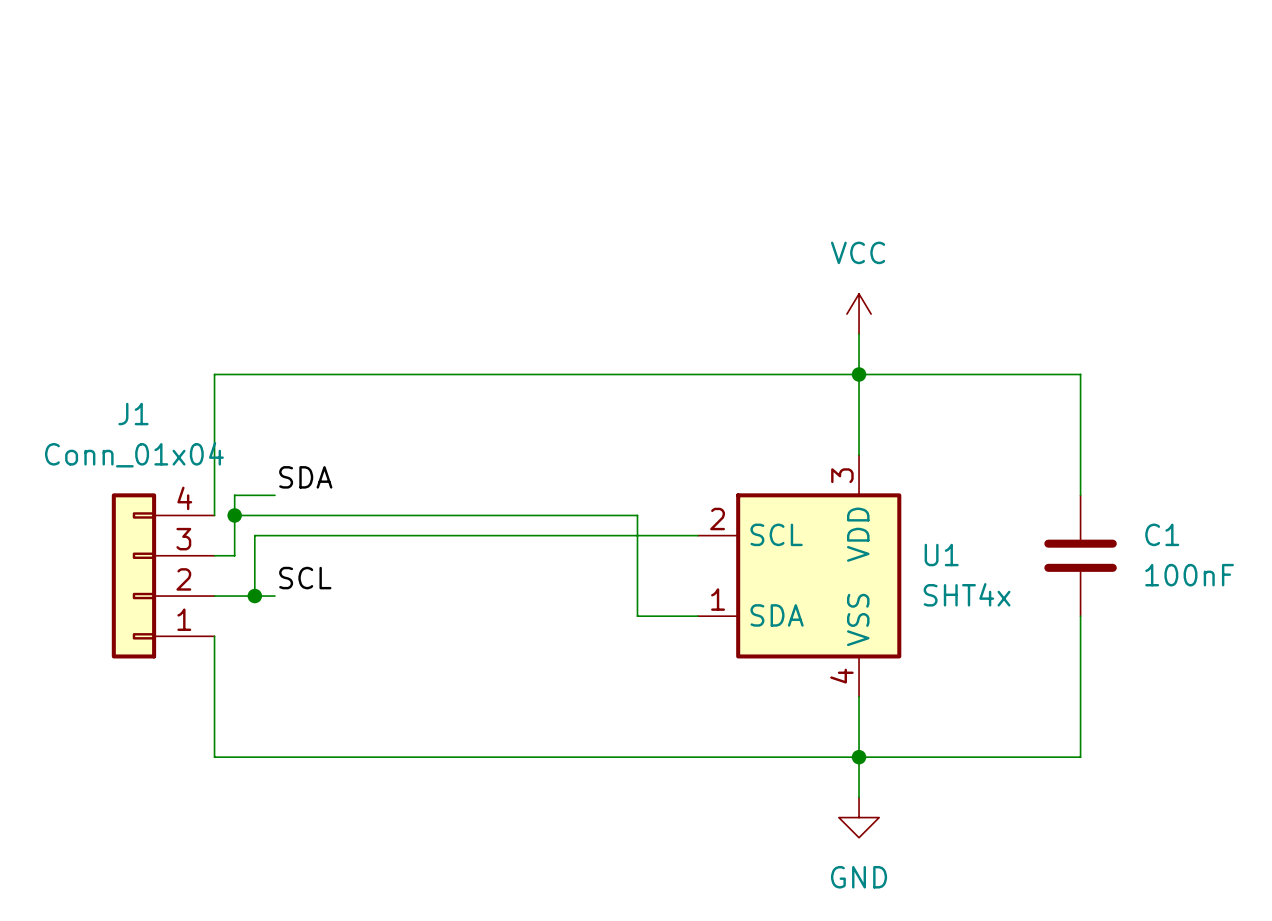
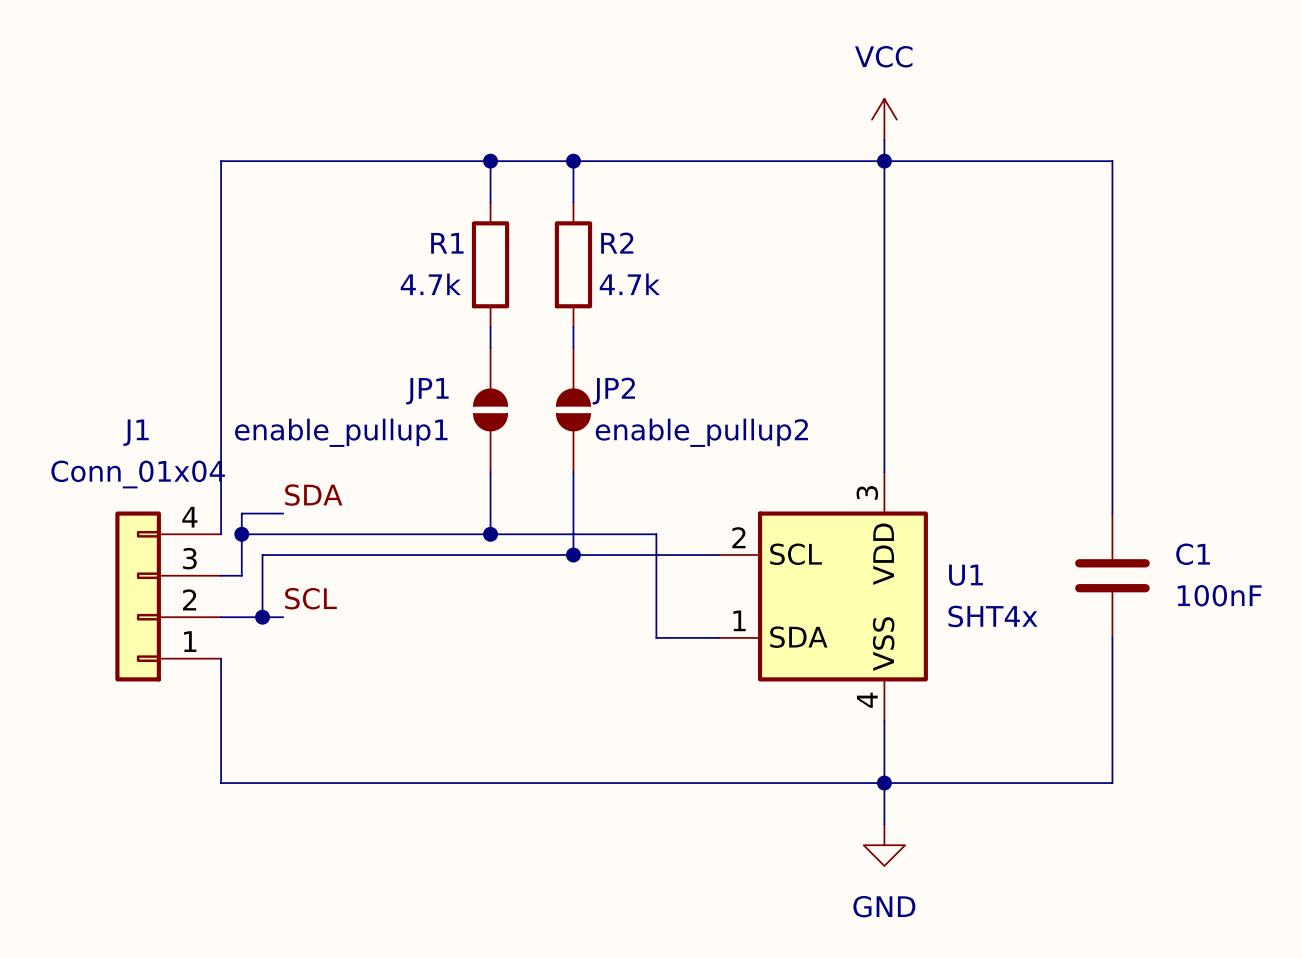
wire: none -> (884, 140) (884, 347)
wire: none -> (490, 161) (490, 202)
junction: none -> (490, 161)
wire: none -> (573, 161) (573, 202)
junction: none -> (573, 161)
junction: none -> (884, 161)
R1: none -> 4.7k (490, 264)
R2: none -> 4.7k (573, 264)
wire: none -> (490, 326) (490, 347)
wire: none -> (573, 326) (573, 347)
power symbol position: VCC (859, 314) -> VCC (884, 119)
wire: (214, 374) (1080, 374) -> (221, 389) (221, 161) (1112, 161) (1112, 389)
junction: (859, 374) -> none
JP1: none -> enable_pullup1 (490, 409)
JP2: none -> enable_pullup2 (573, 409)
wire: none -> (490, 472) (490, 534)
wire: none -> (573, 472) (573, 555)
junction: none -> (490, 534)
junction: none -> (573, 555)

